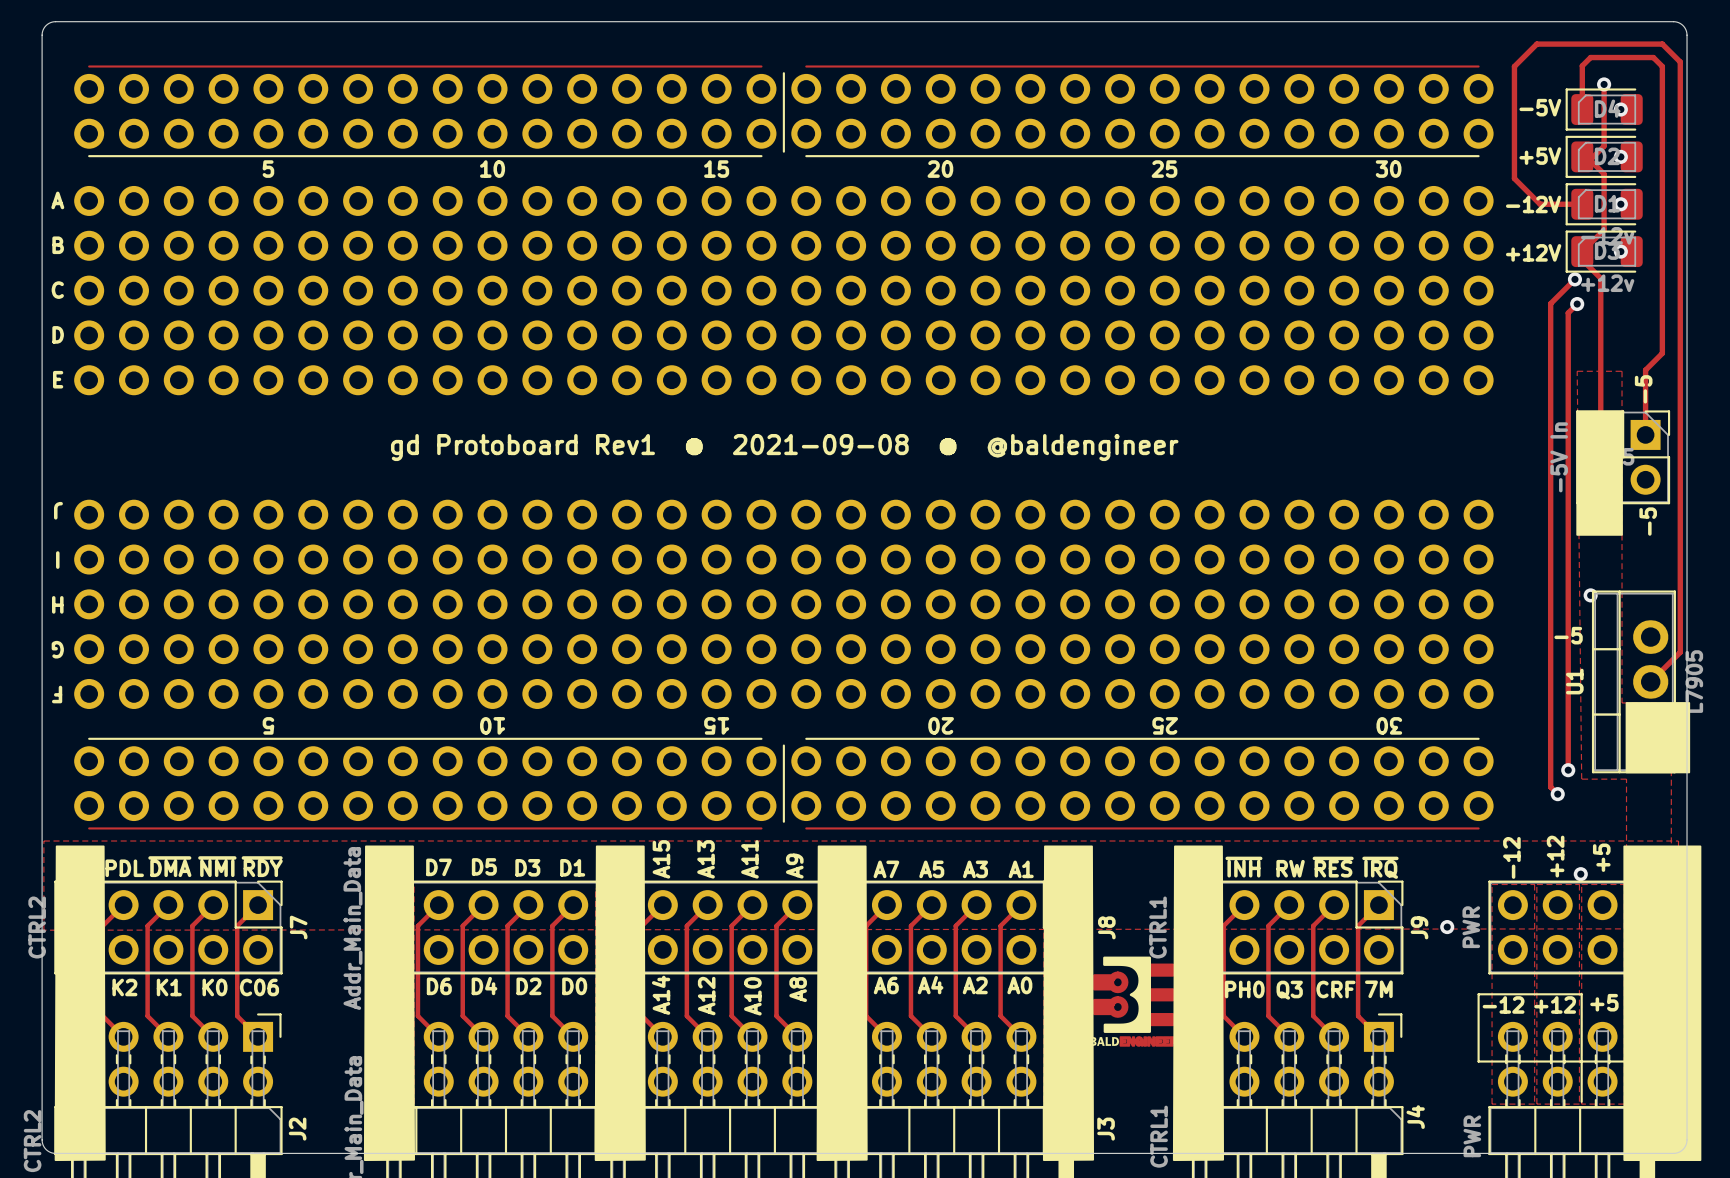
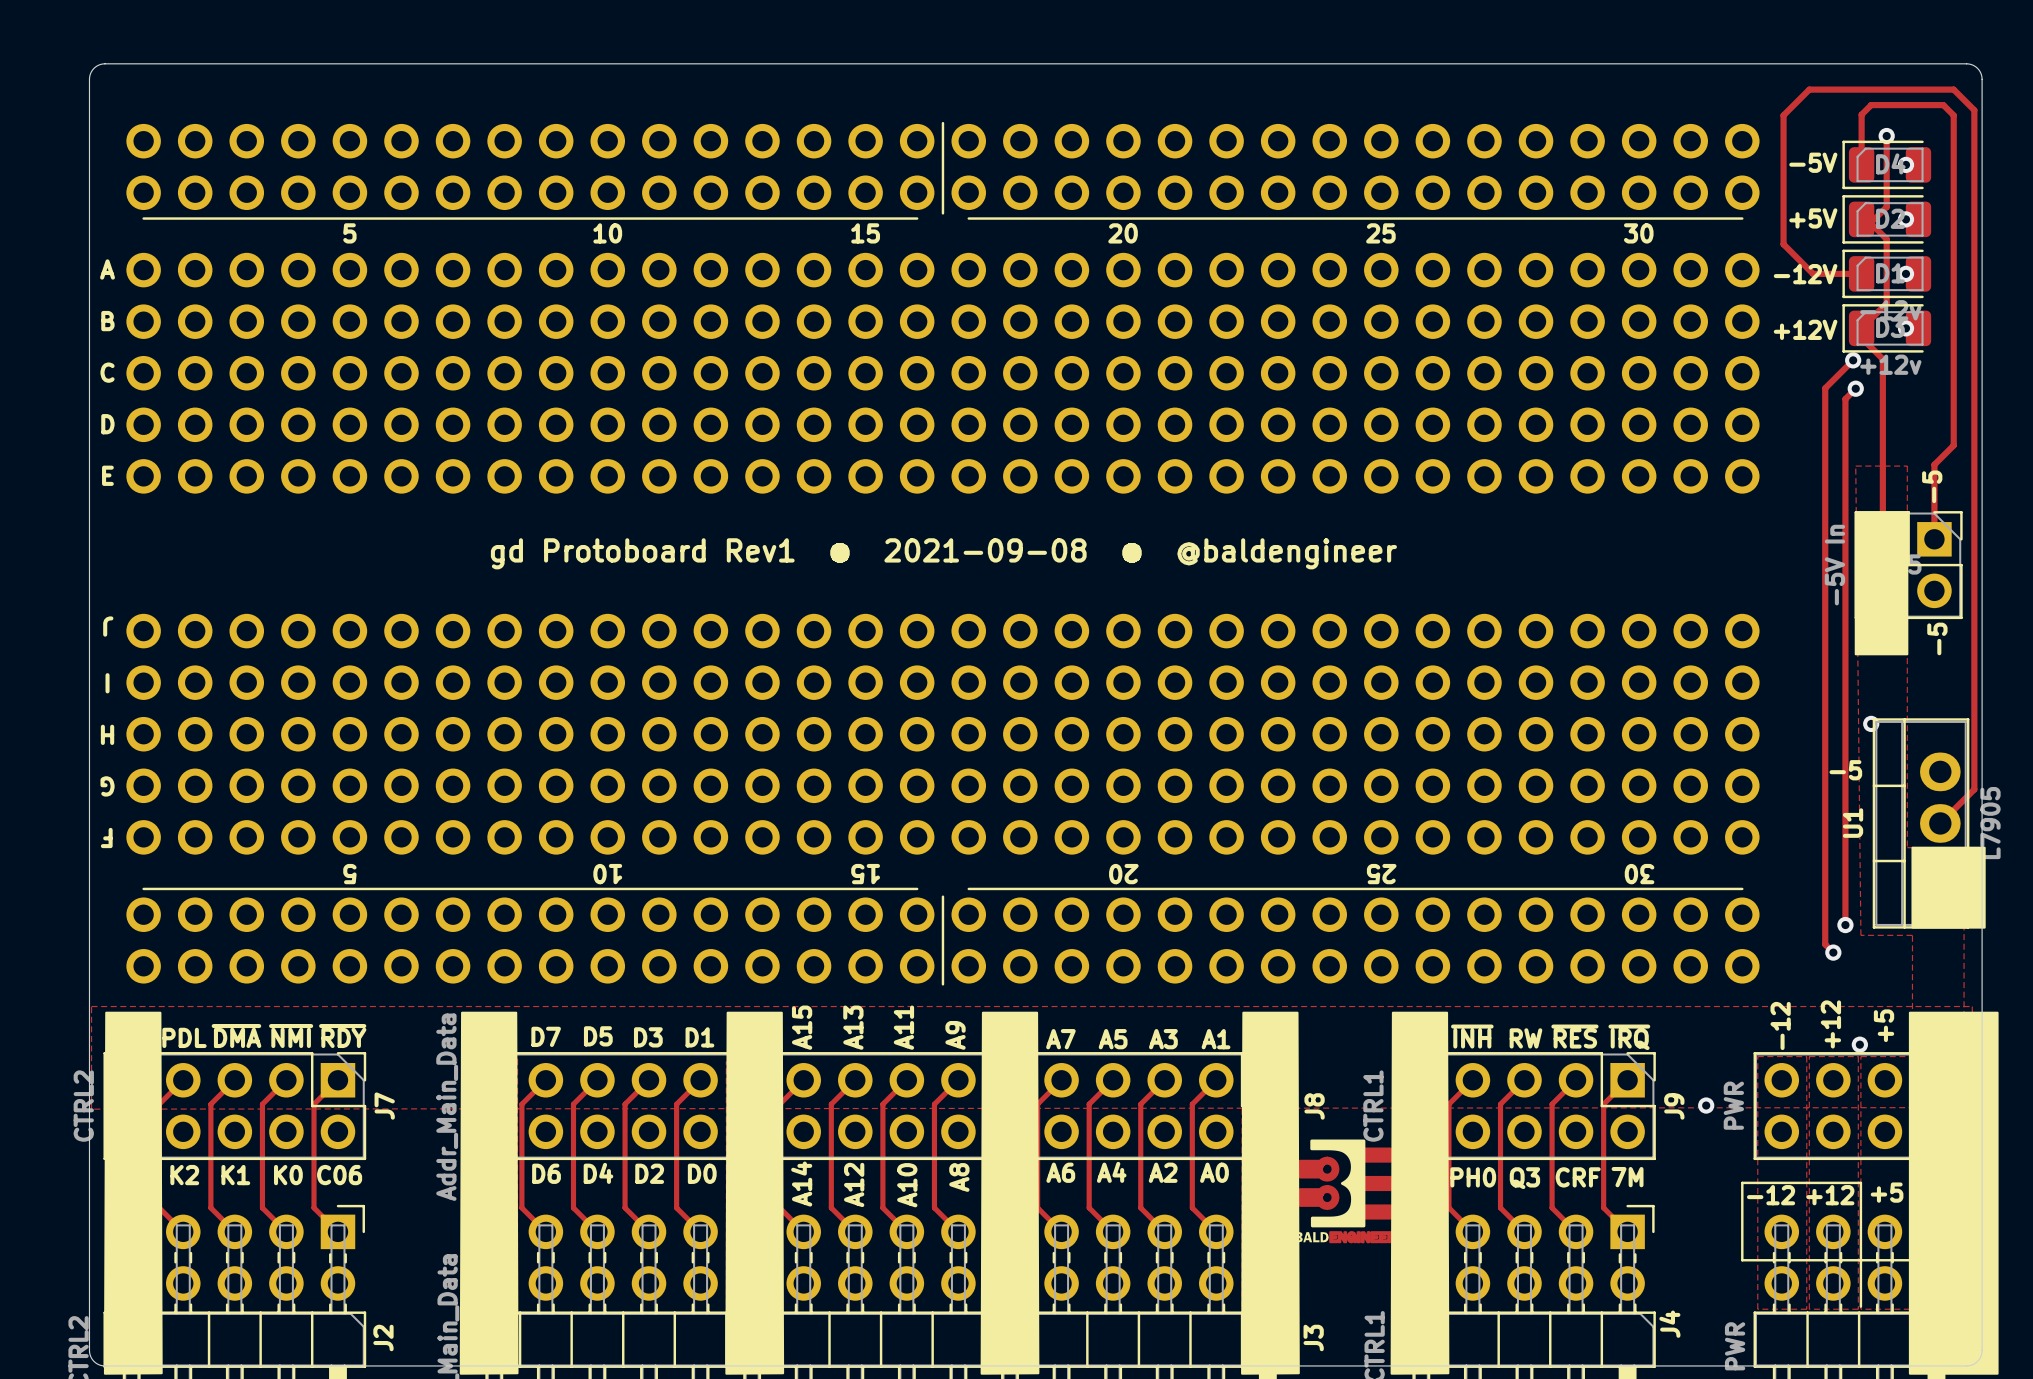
track: (89, 66) (761, 66) -> none
track: (806, 66) (1478, 66) -> none
track: (89, 828) (761, 828) -> none
track: (806, 828) (1478, 828) -> none

